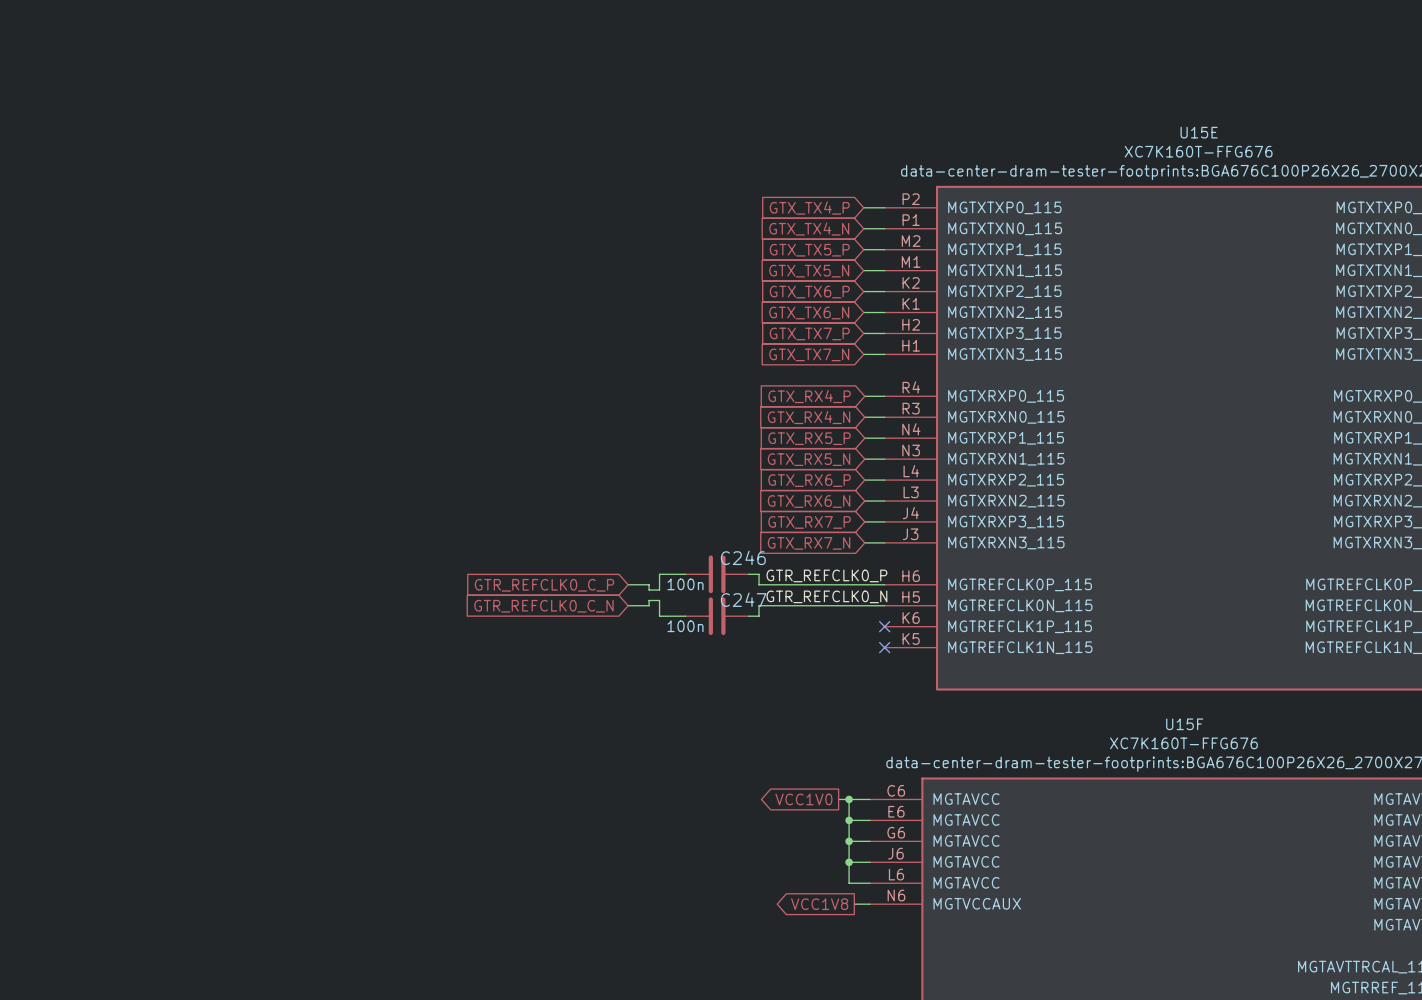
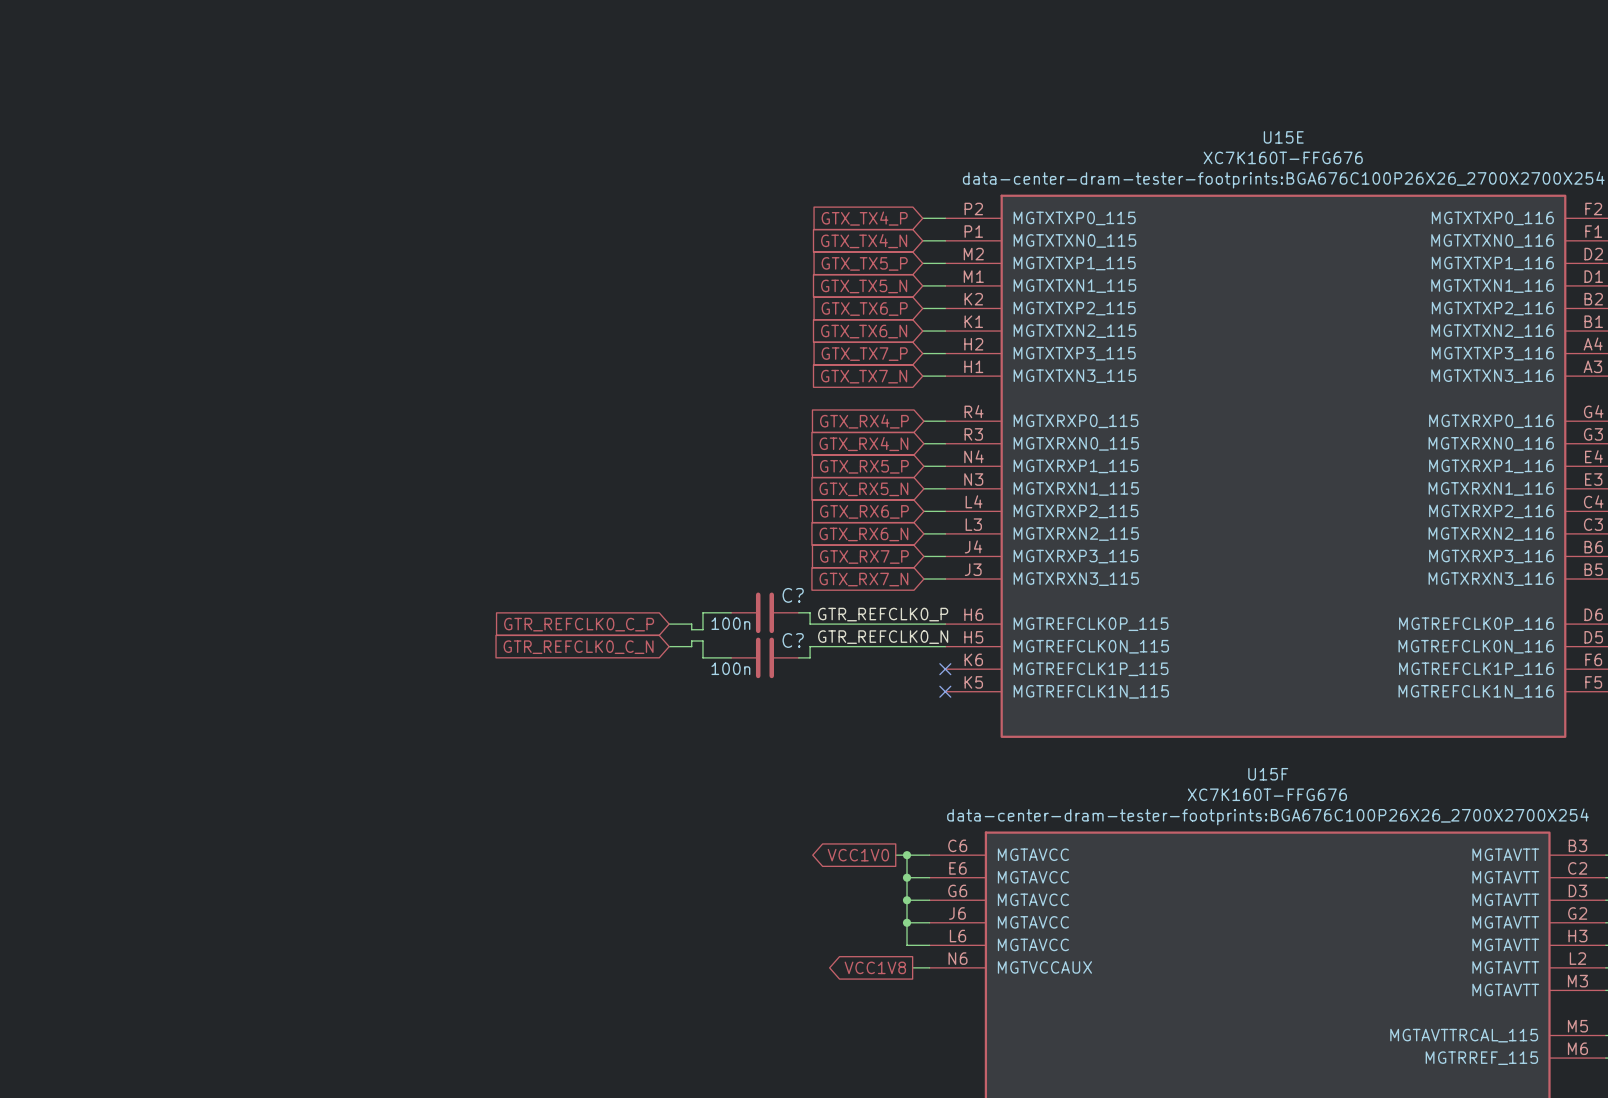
C246 name: C246 (743, 557) -> C? (793, 595)
C247 name: C247 (743, 599) -> C? (793, 640)

